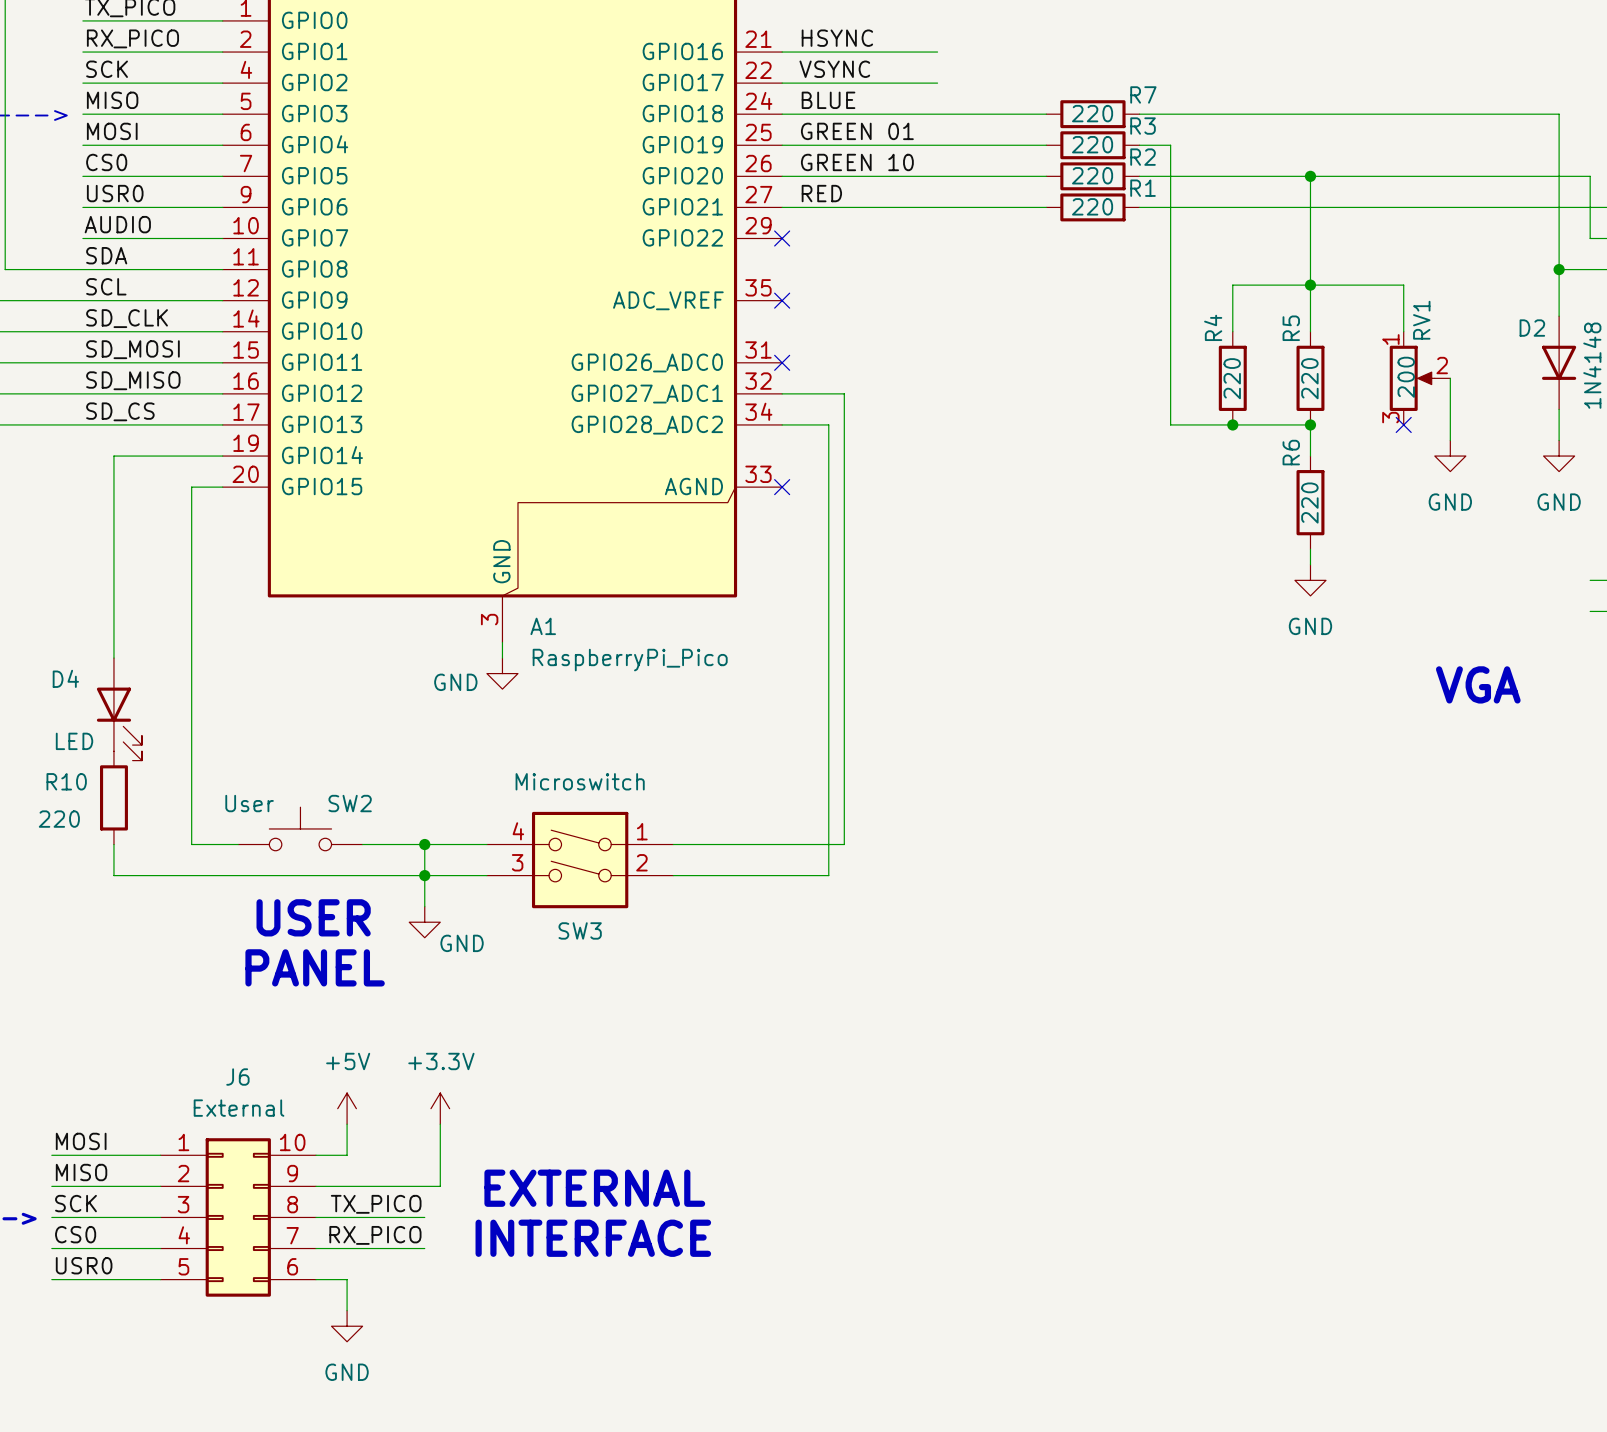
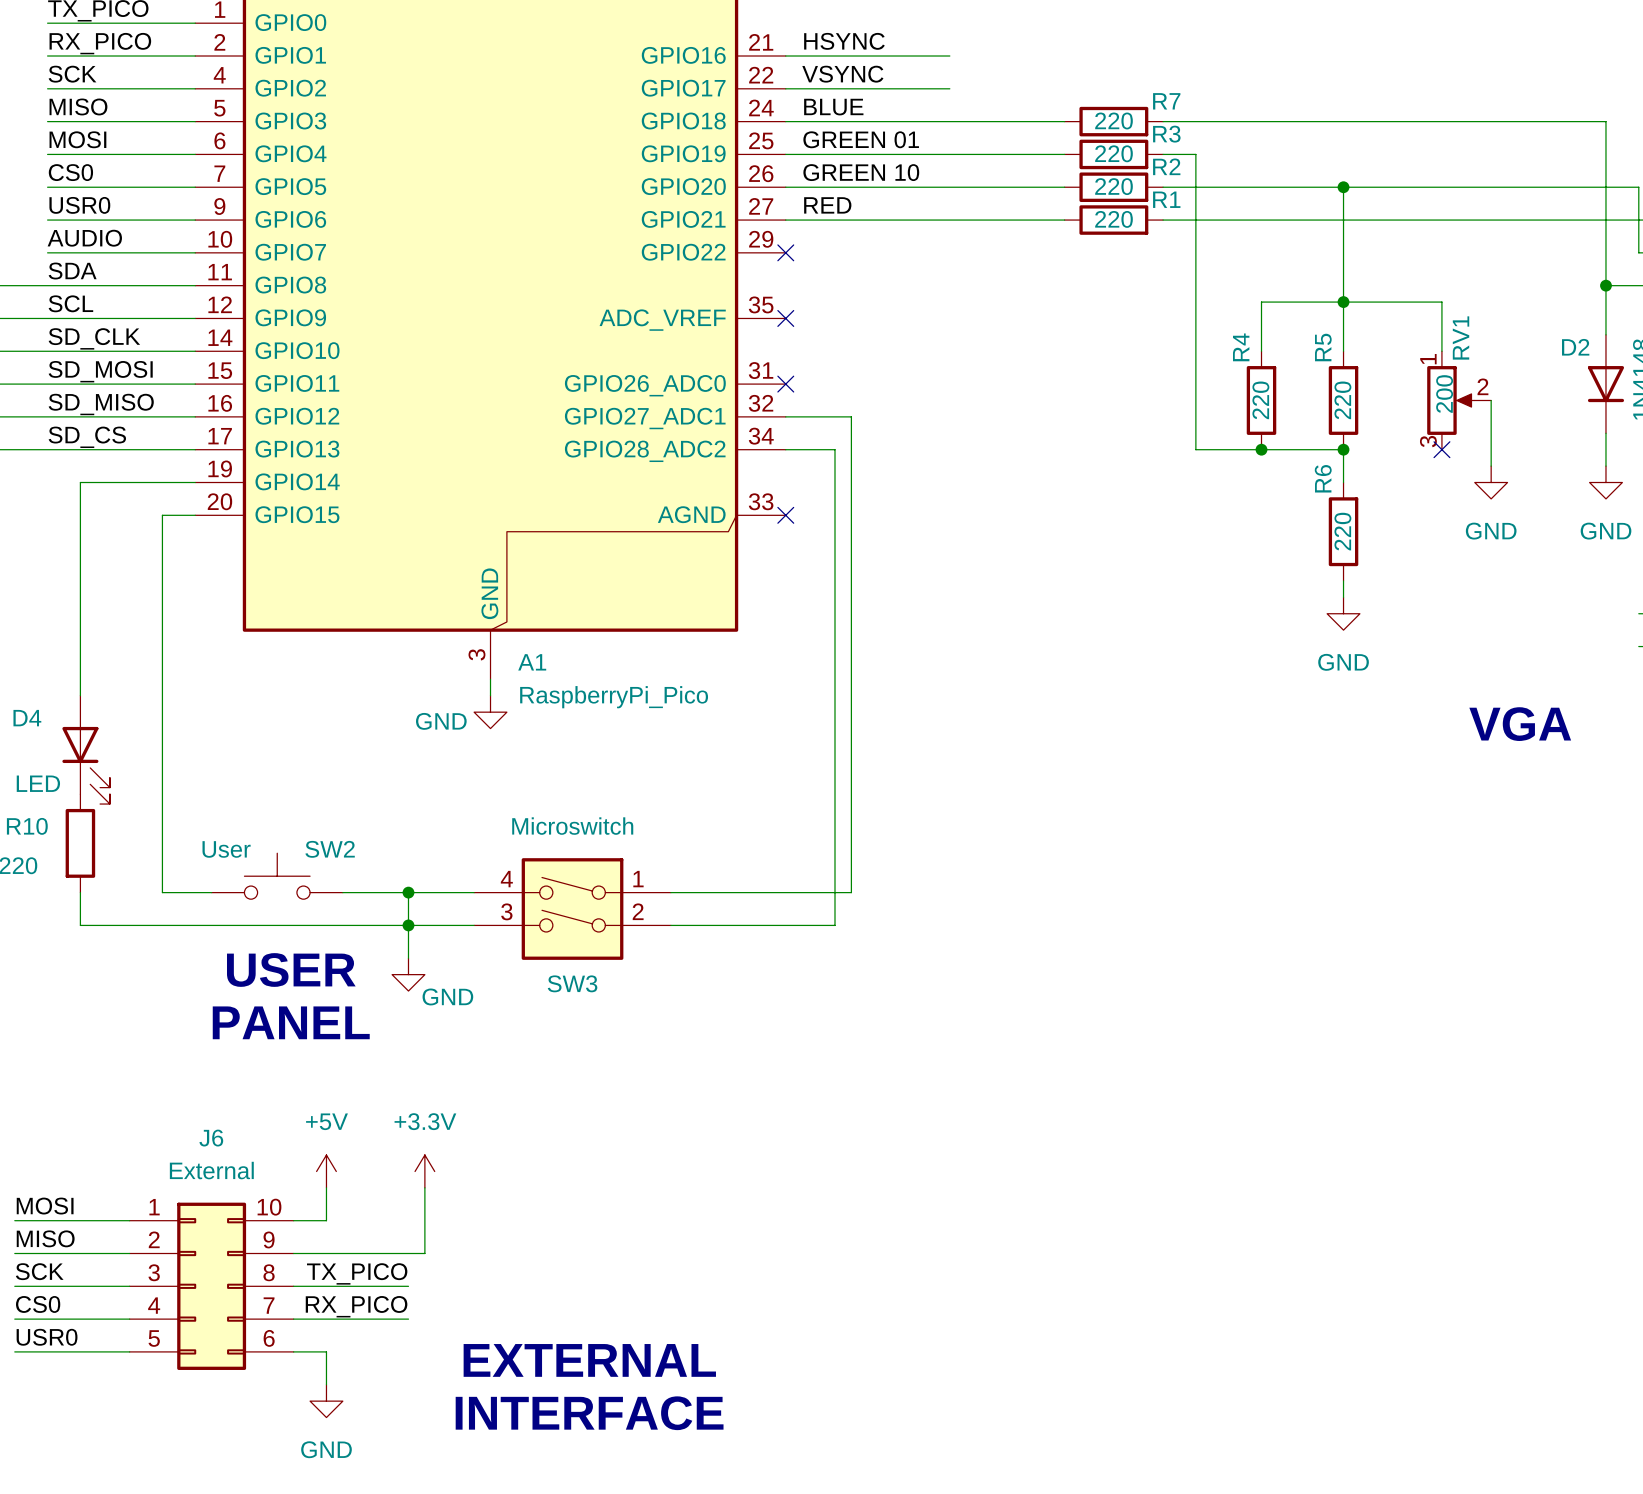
text position: EXTERNAL (594, 1188) -> EXTERNAL (589, 1360)
text position: INTERFACE (593, 1238) -> INTERFACE (589, 1413)

